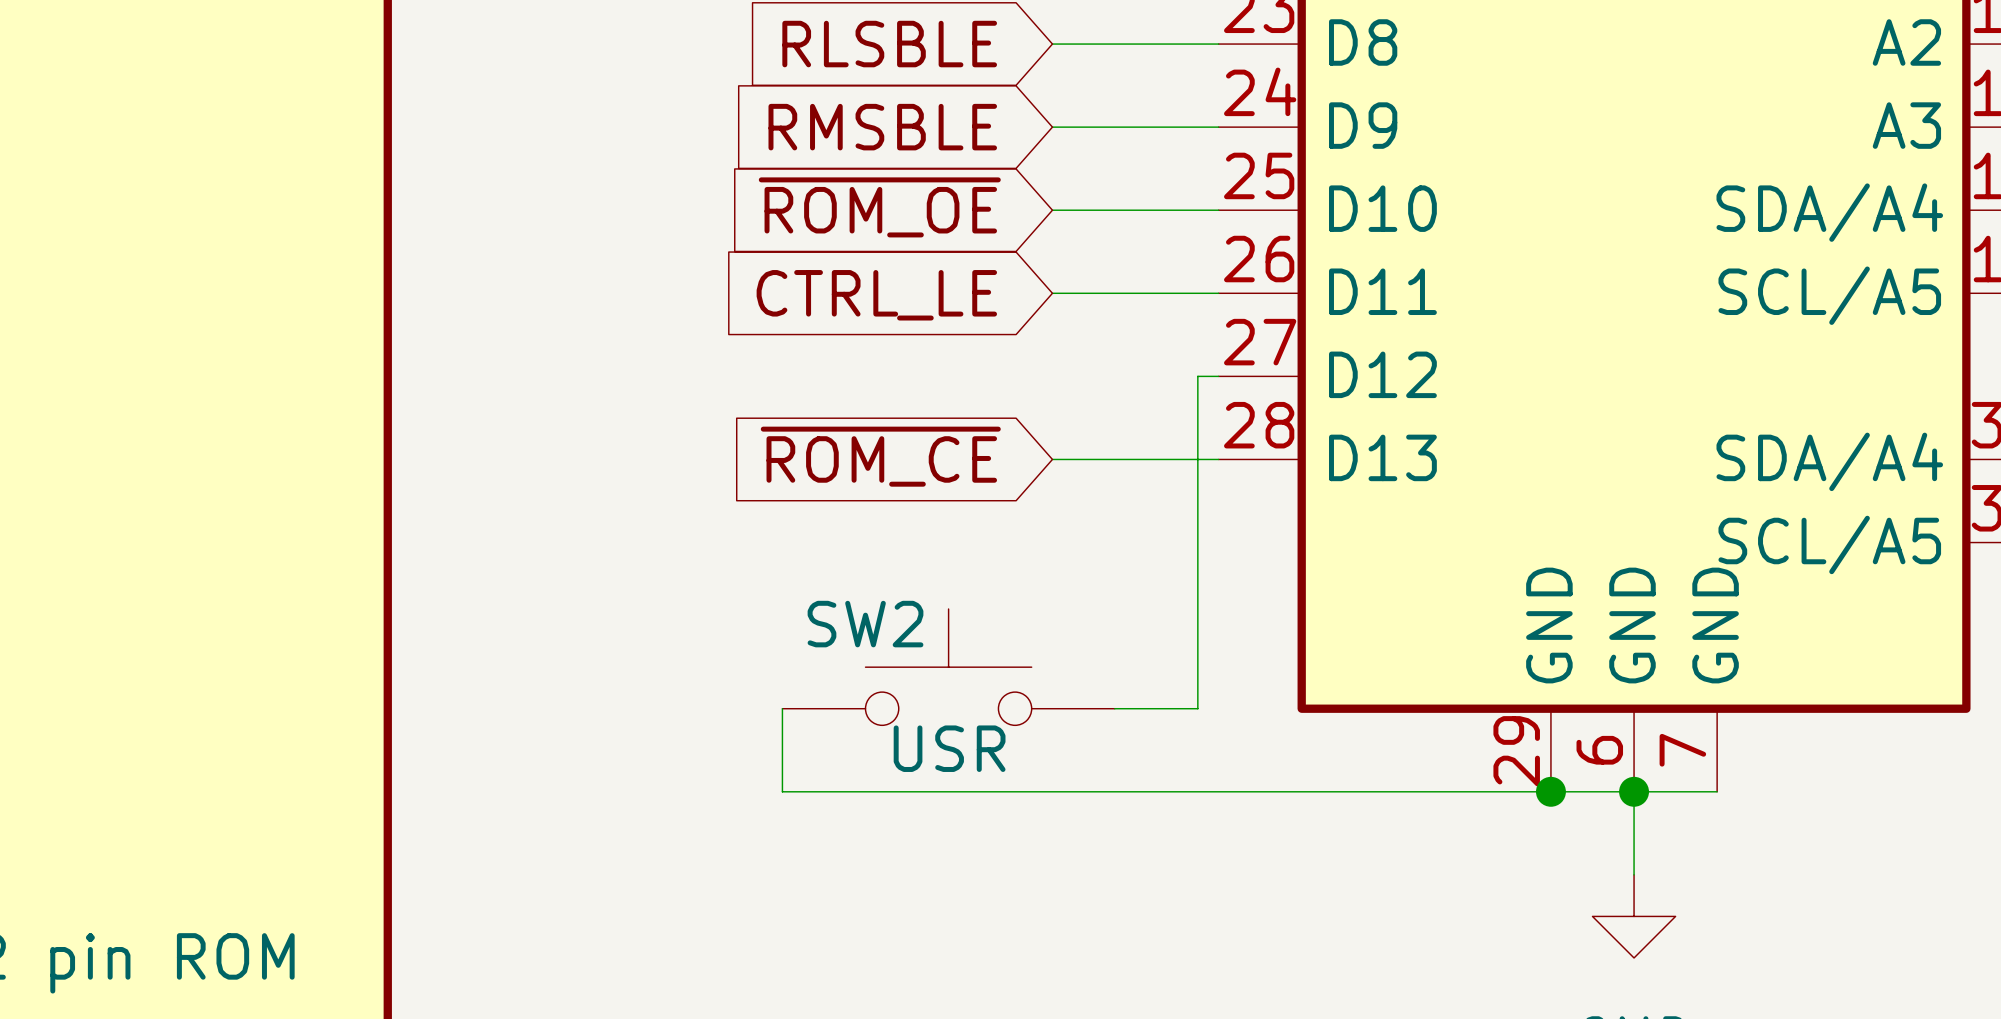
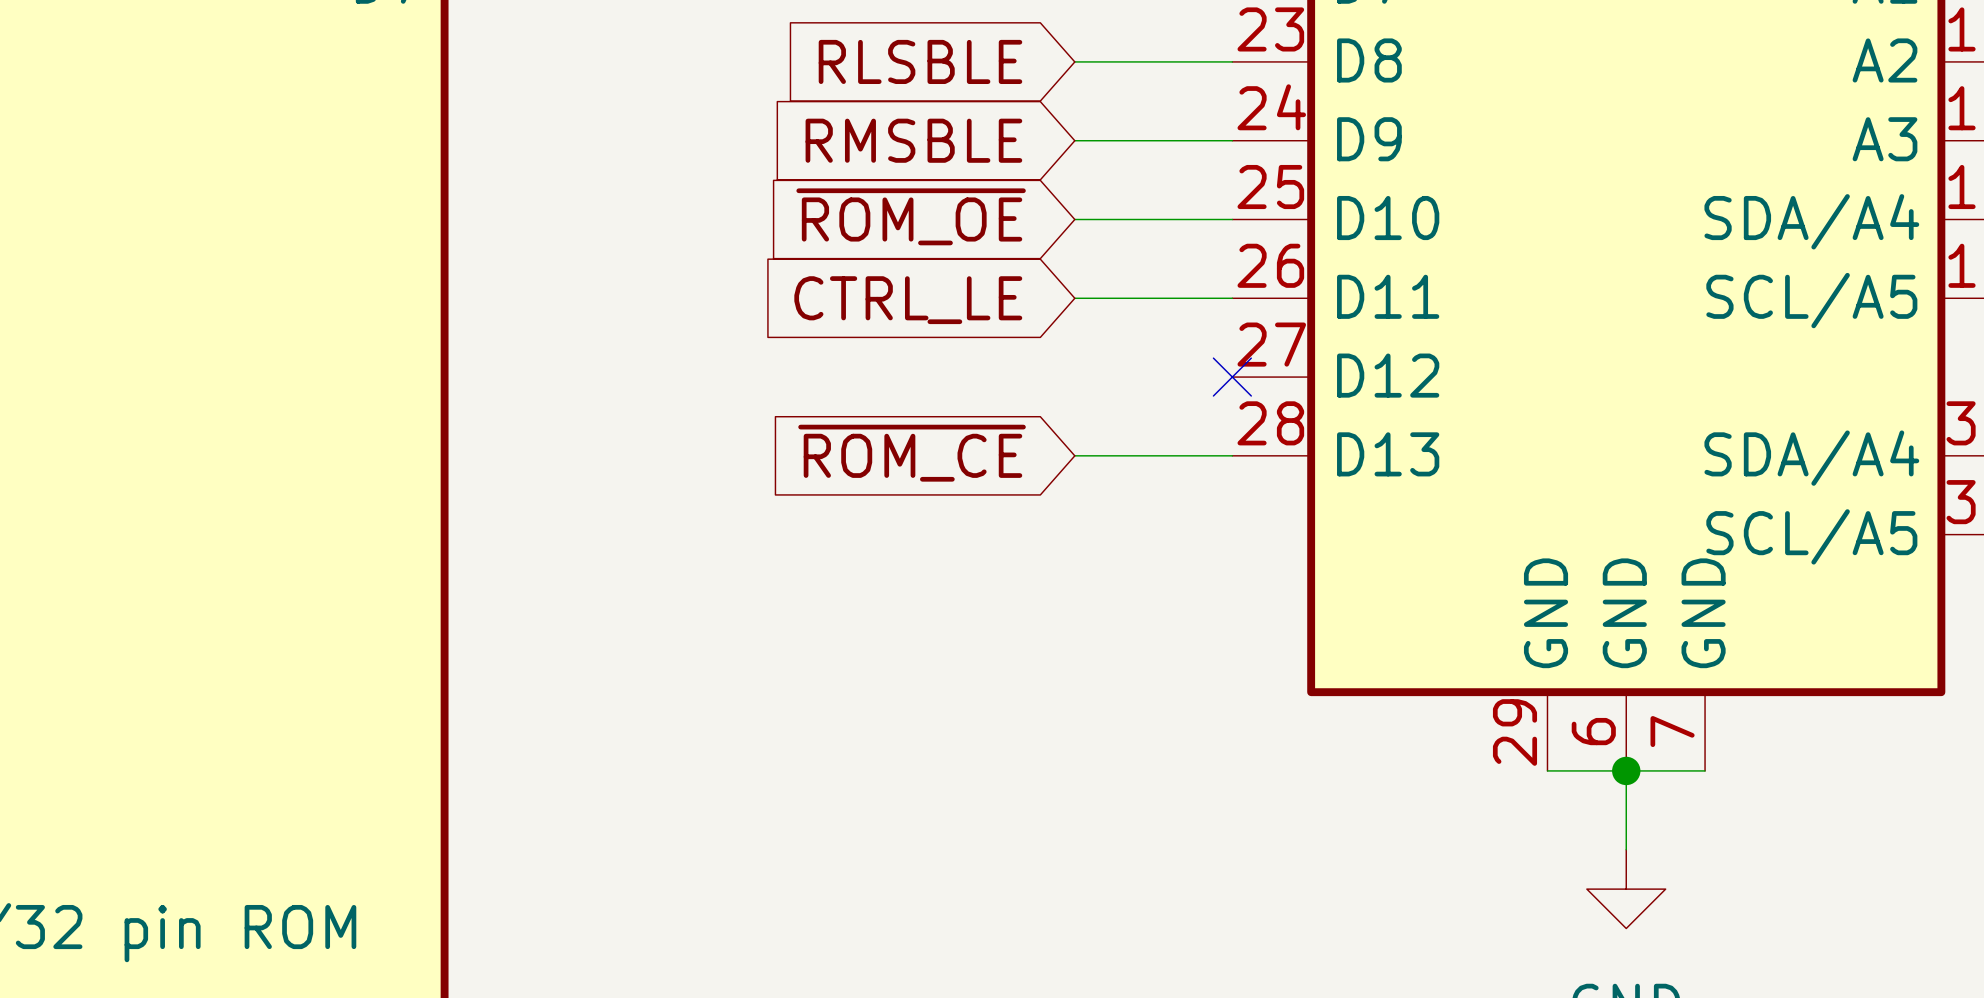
wire: (1218, 376) (1197, 376) (1197, 708) (1114, 708) -> none
no-connect mark: none -> (1232, 377)
SW2: USR (948, 667) -> none
wire: (782, 708) (782, 791) (1550, 791) -> none
junction: (1550, 791) -> none

